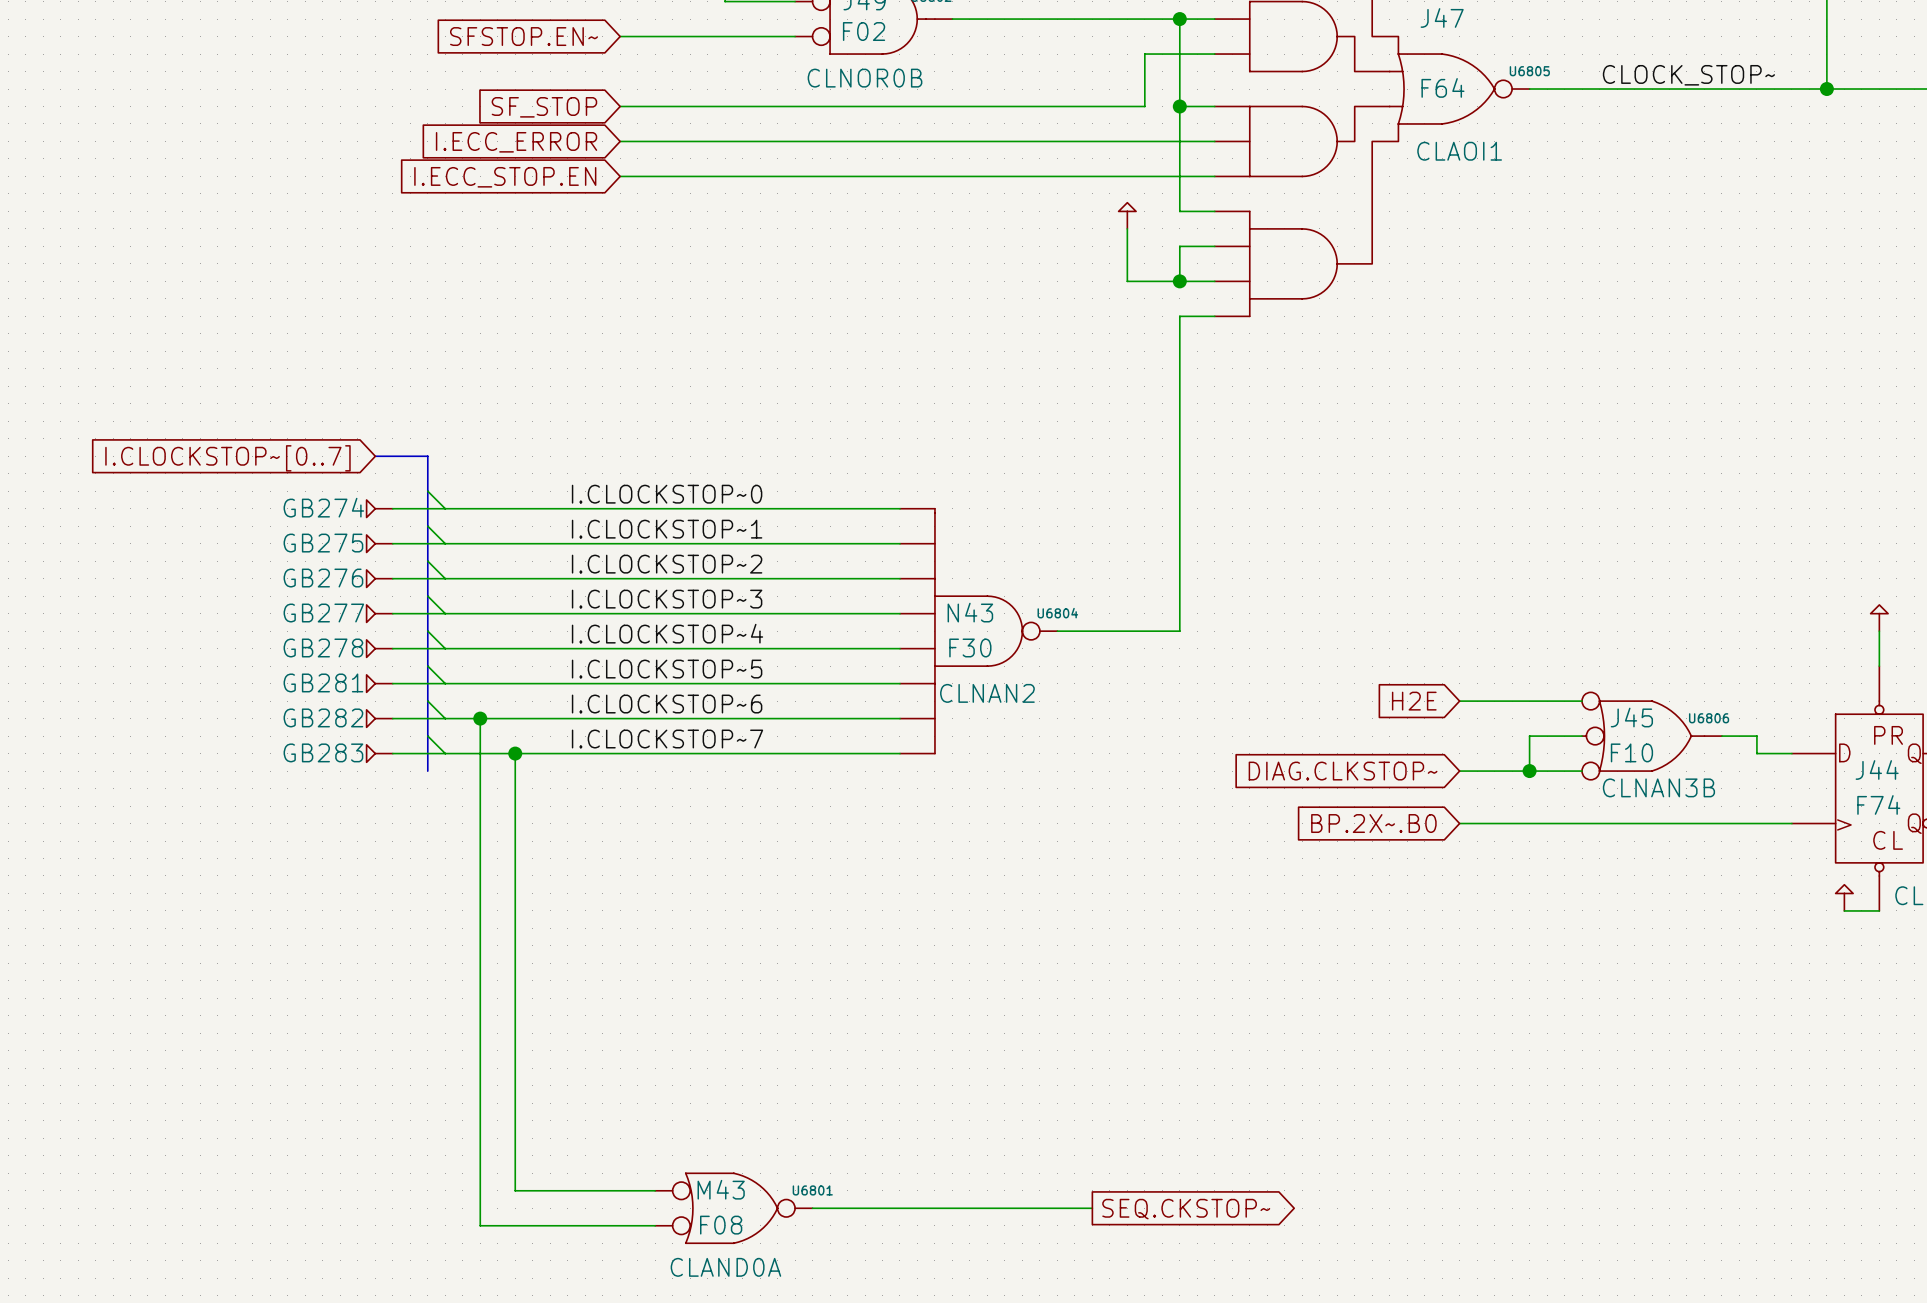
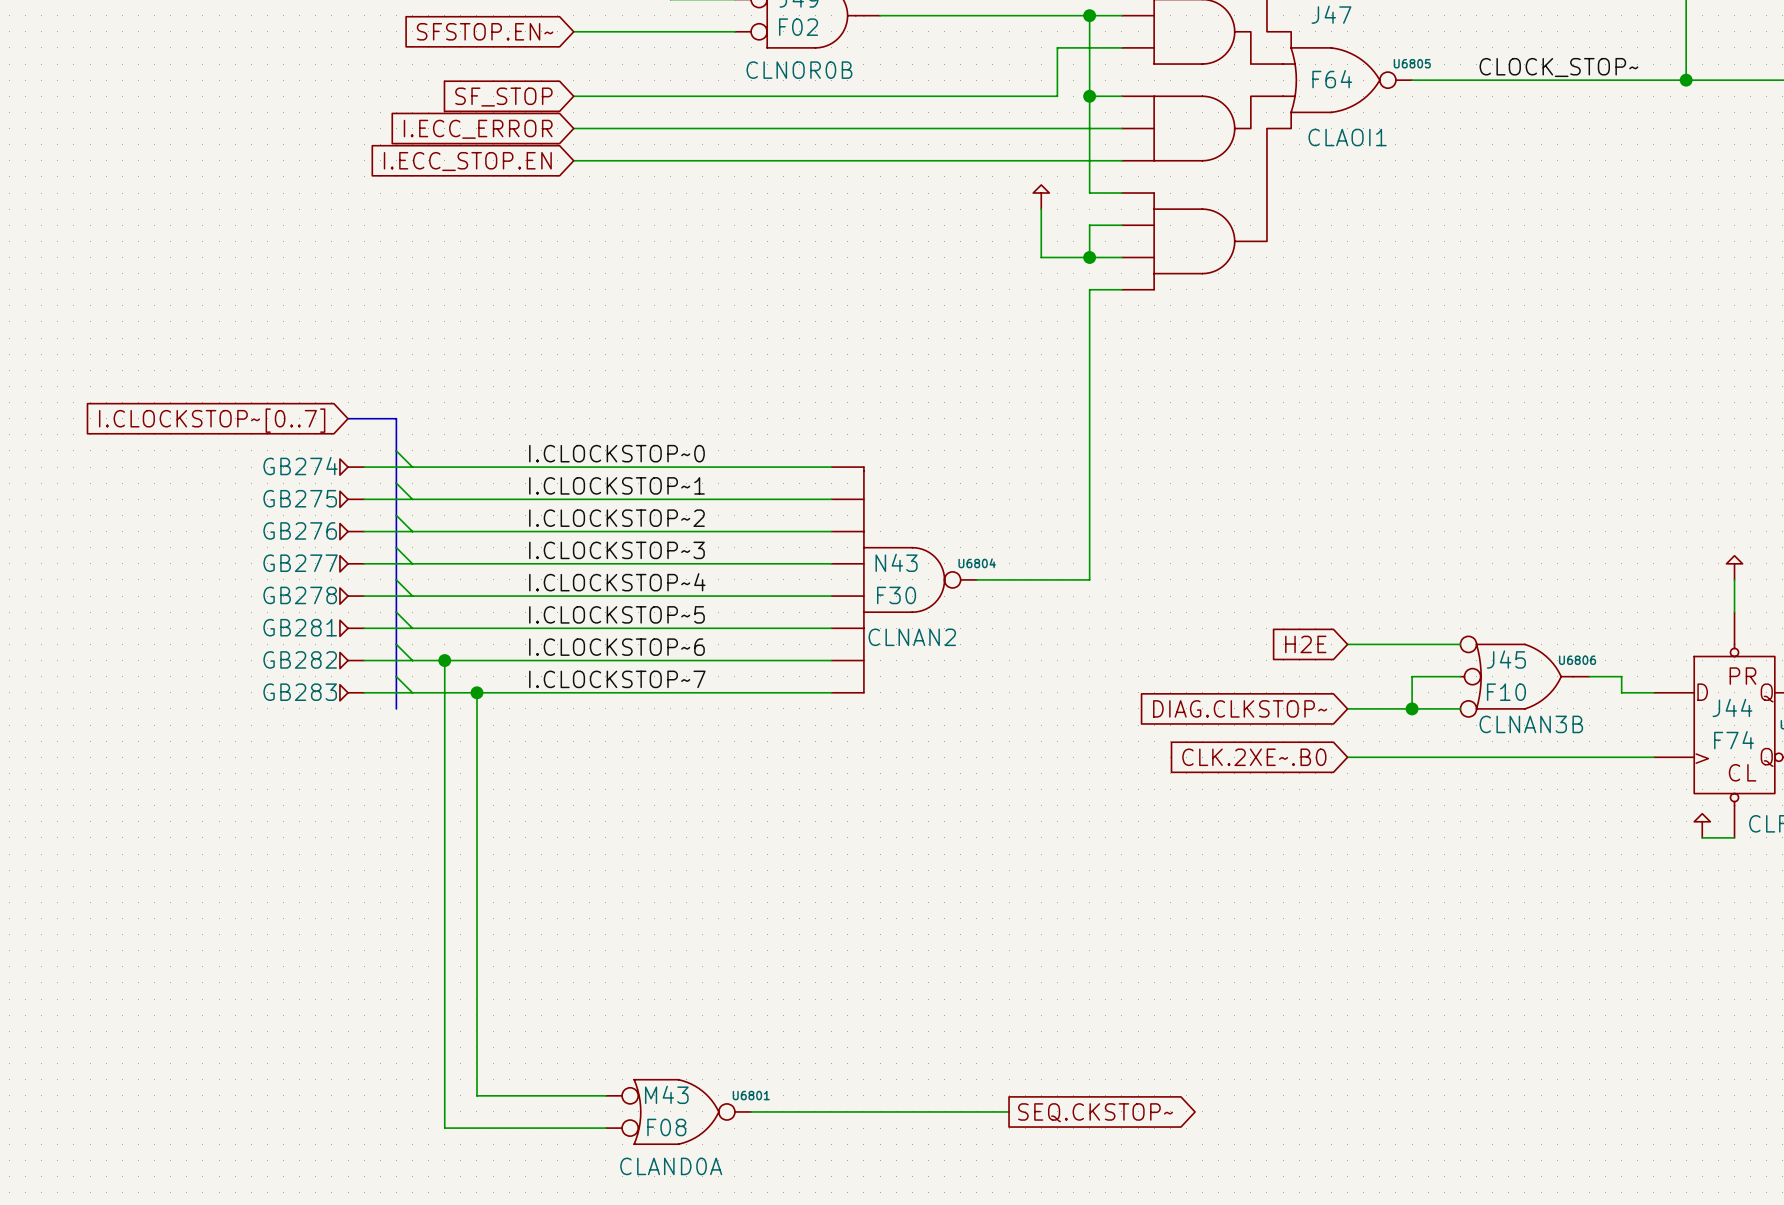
global label: BP.2X~.B0 (1373, 823) -> CLK.2XE~.B0 (1254, 757)

